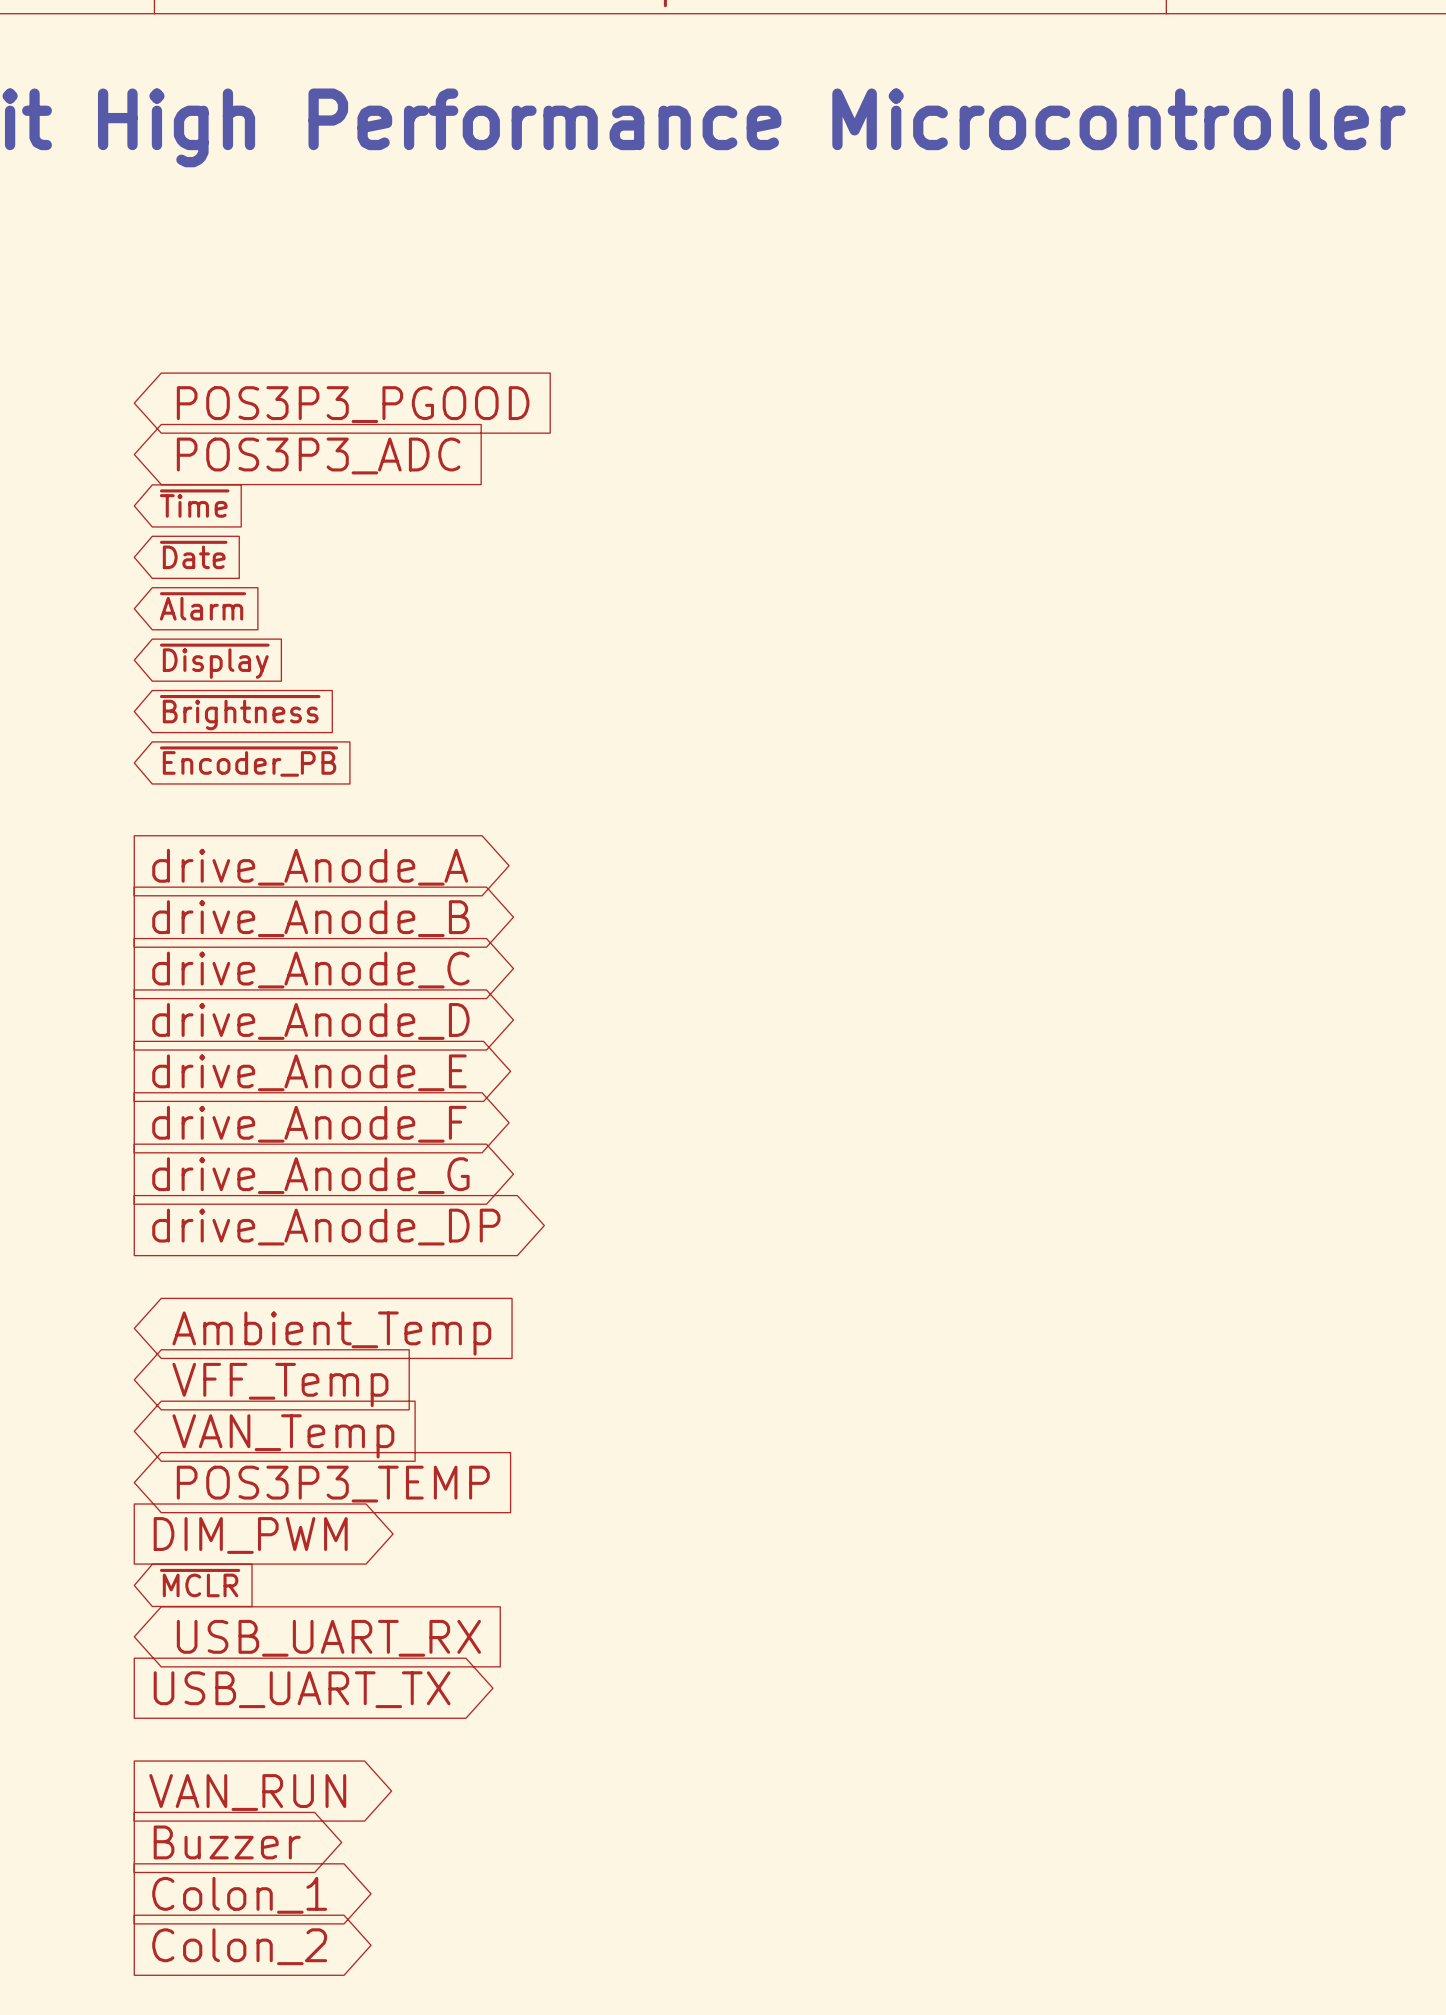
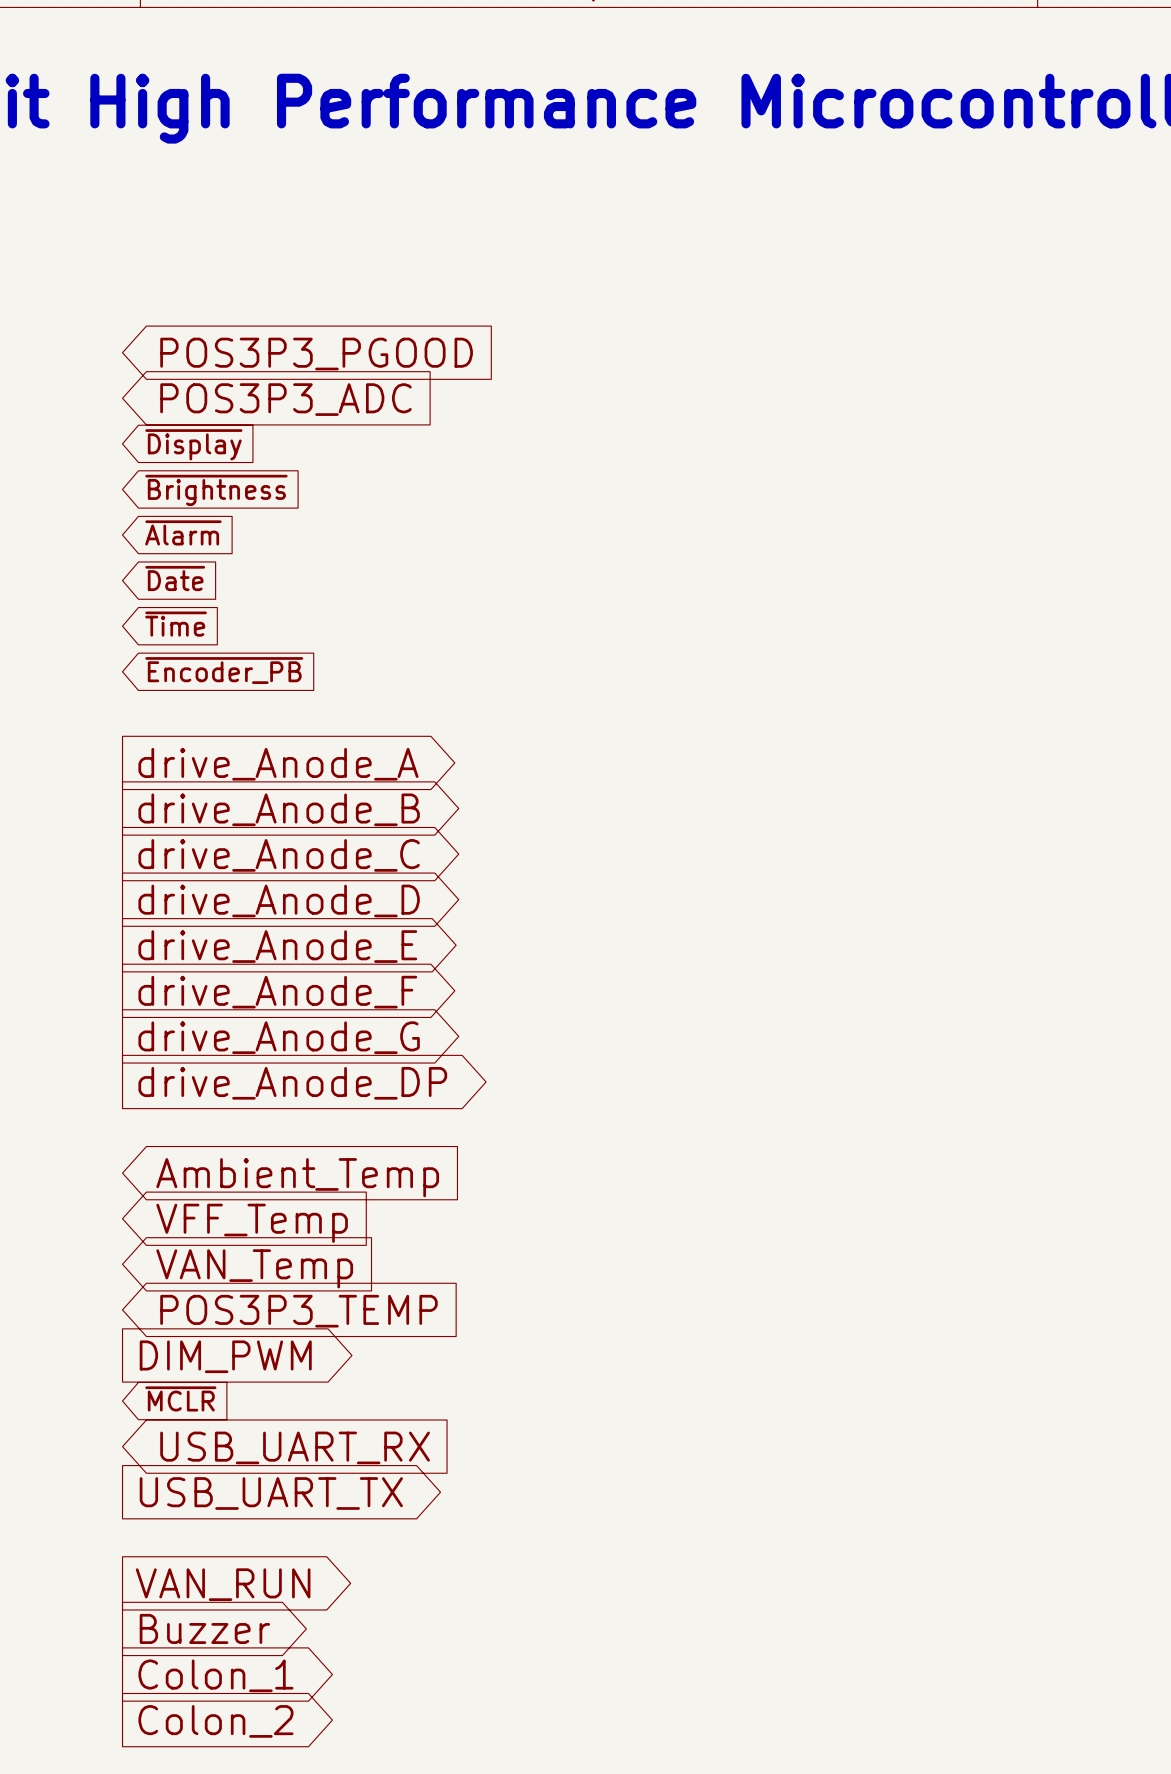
global label: ~{Time} (194, 503) -> ~{Display} (193, 444)
global label: ~{Date} (193, 554) -> ~{Brightness} (216, 490)
global label: ~{Display} (214, 661) -> ~{Date} (175, 578)
global label: ~{Brightness} (240, 712) -> ~{Time} (176, 624)

